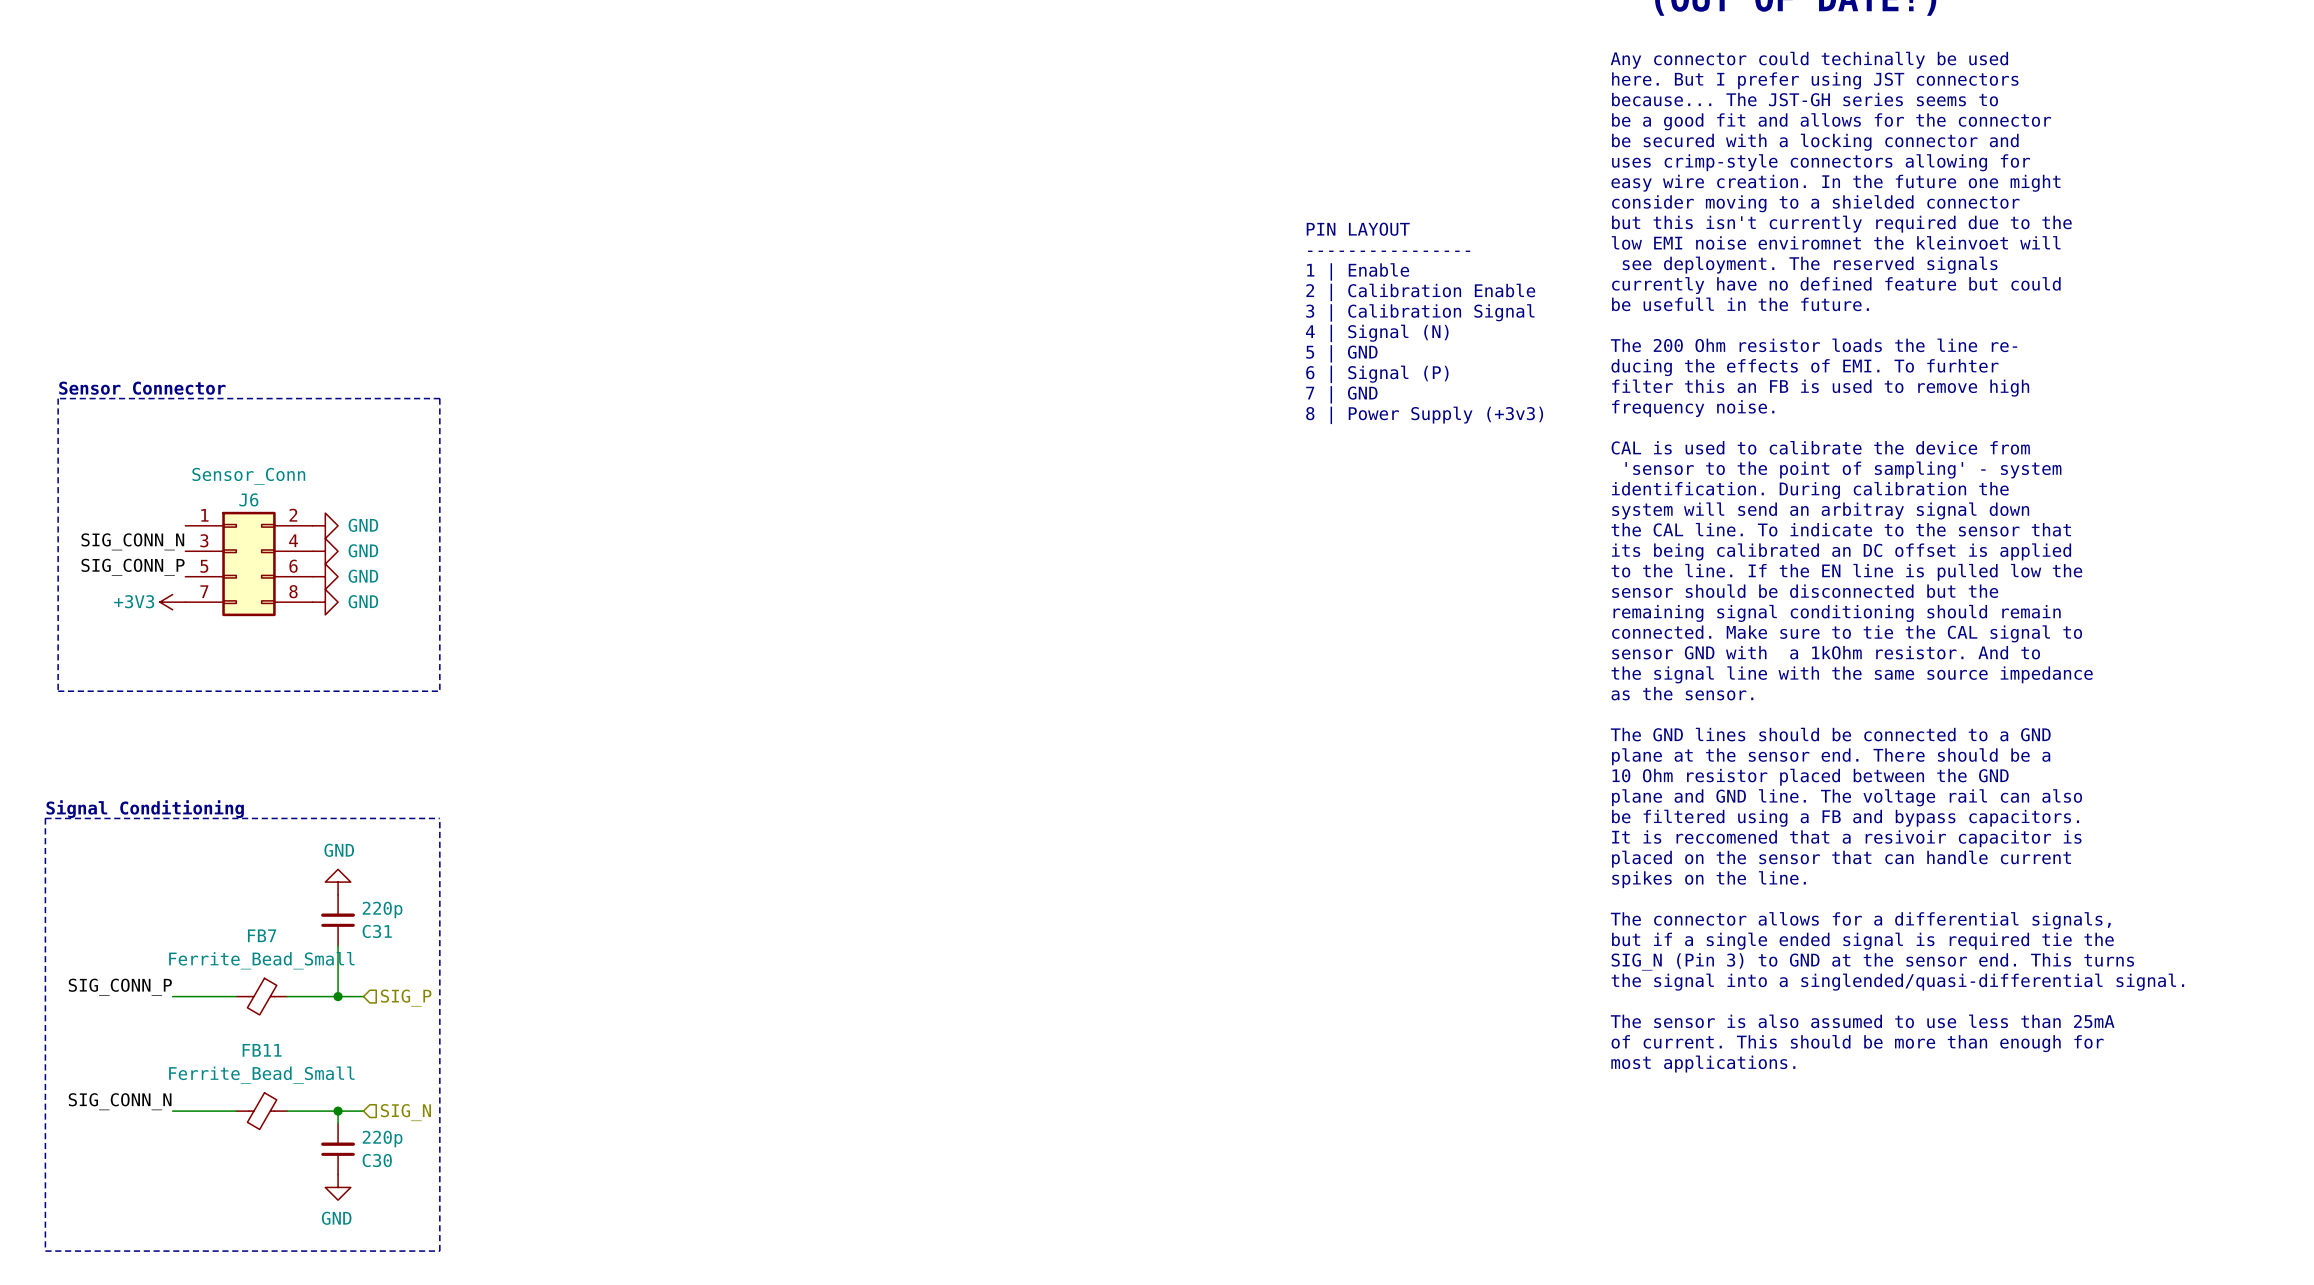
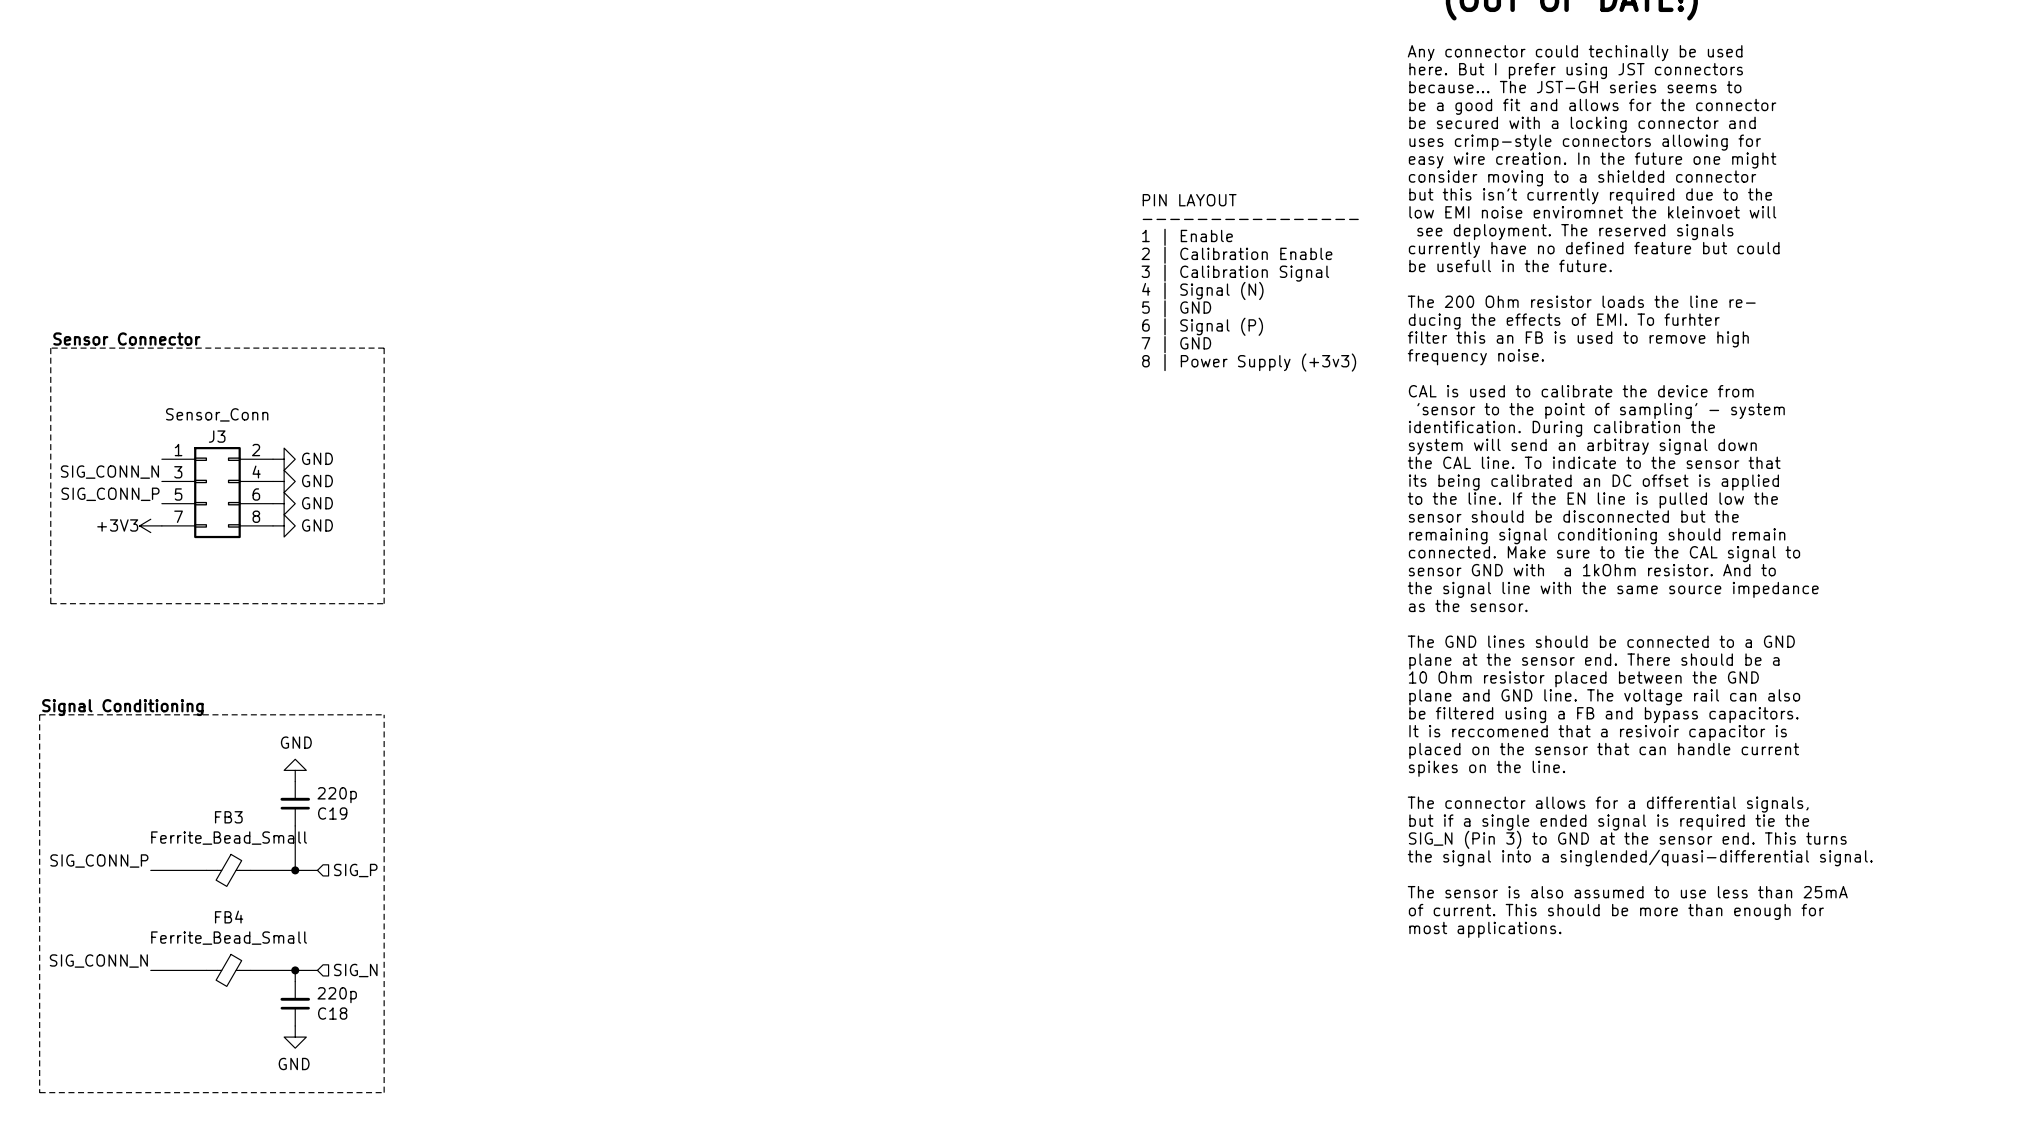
J6 name: J6 (248, 499) -> J3 (217, 436)
C31 name: C31 (377, 931) -> C19 (332, 813)
FB7 name: FB7 (262, 935) -> FB3 (228, 817)
FB11 name: FB11 (262, 1050) -> FB4 (229, 917)
C30 name: C30 (377, 1160) -> C18 (332, 1013)

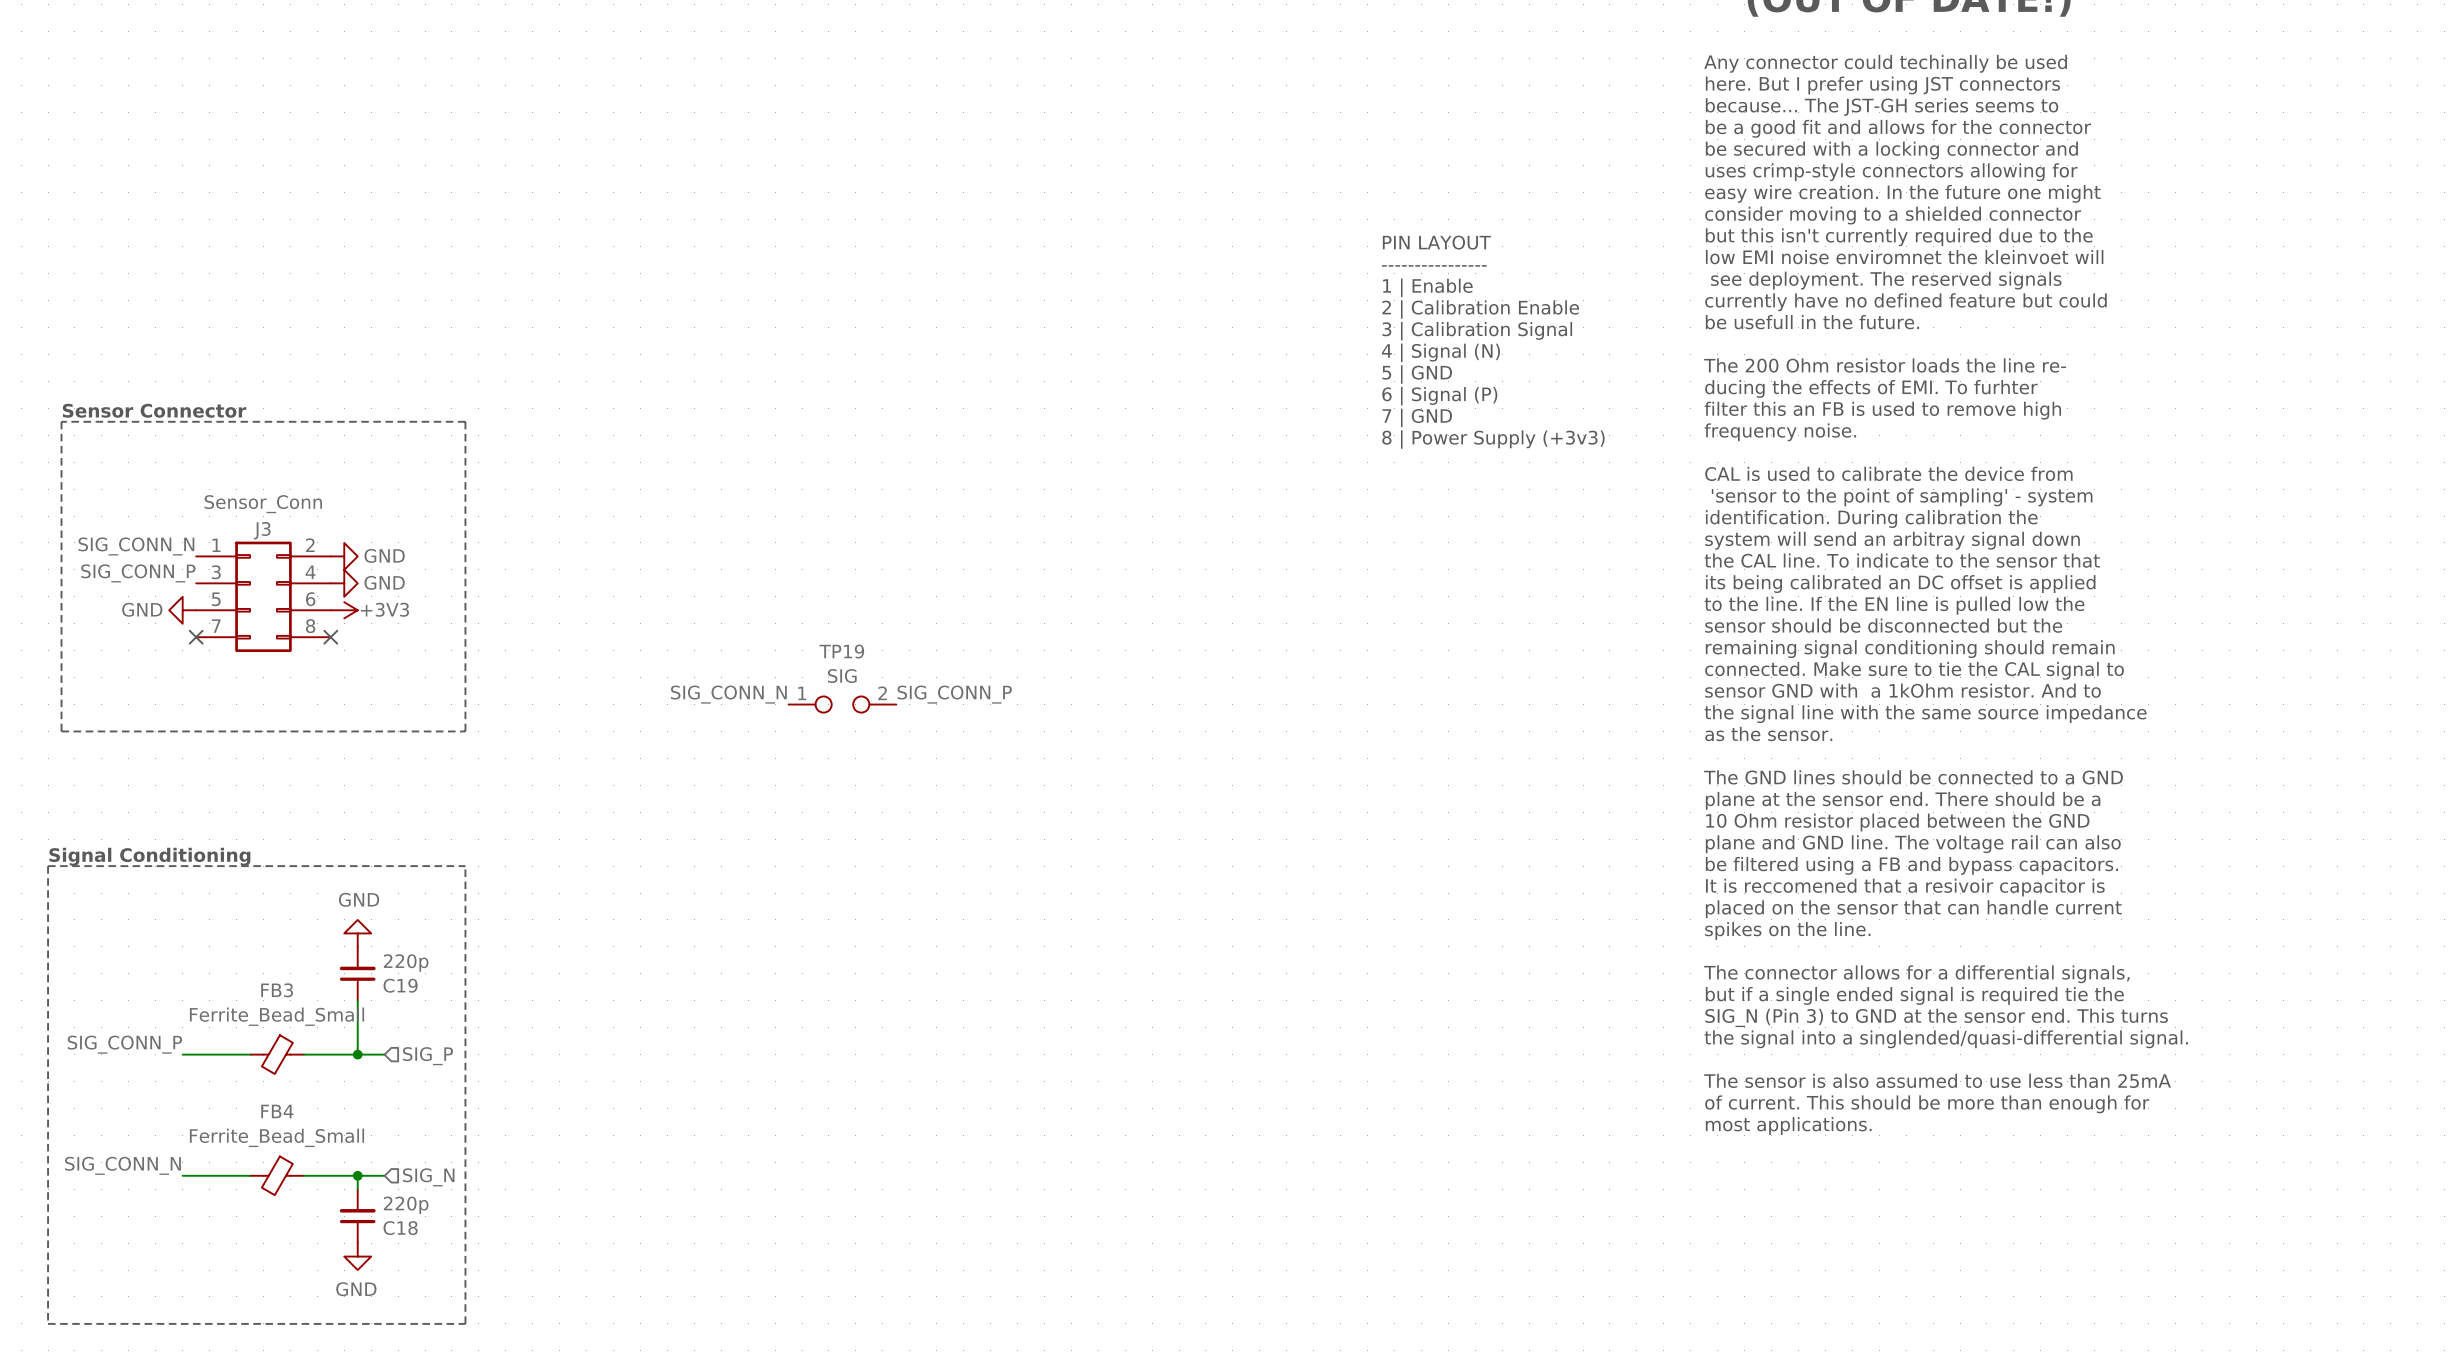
label: none -> SIG_CONN_N (136, 546)
label: SIG_CONN_N (109, 472) -> SIG_CONN_P (138, 573)
label: SIG_CONN_P (110, 494) -> none
power symbol: GND (284, 503) -> +3V3 (344, 610)
power symbol: +3V3 (150, 525) -> none
no-connect mark: none -> (196, 637)
no-connect mark: none -> (330, 637)
power symbol rotation: 0° (284, 525) -> 180° (182, 610)
power symbol position: GND (284, 525) -> GND (182, 610)
label: none -> SIG_CONN_N (728, 694)
label: none -> SIG_CONN_P (954, 694)
TP19: none -> SIG (842, 704)

